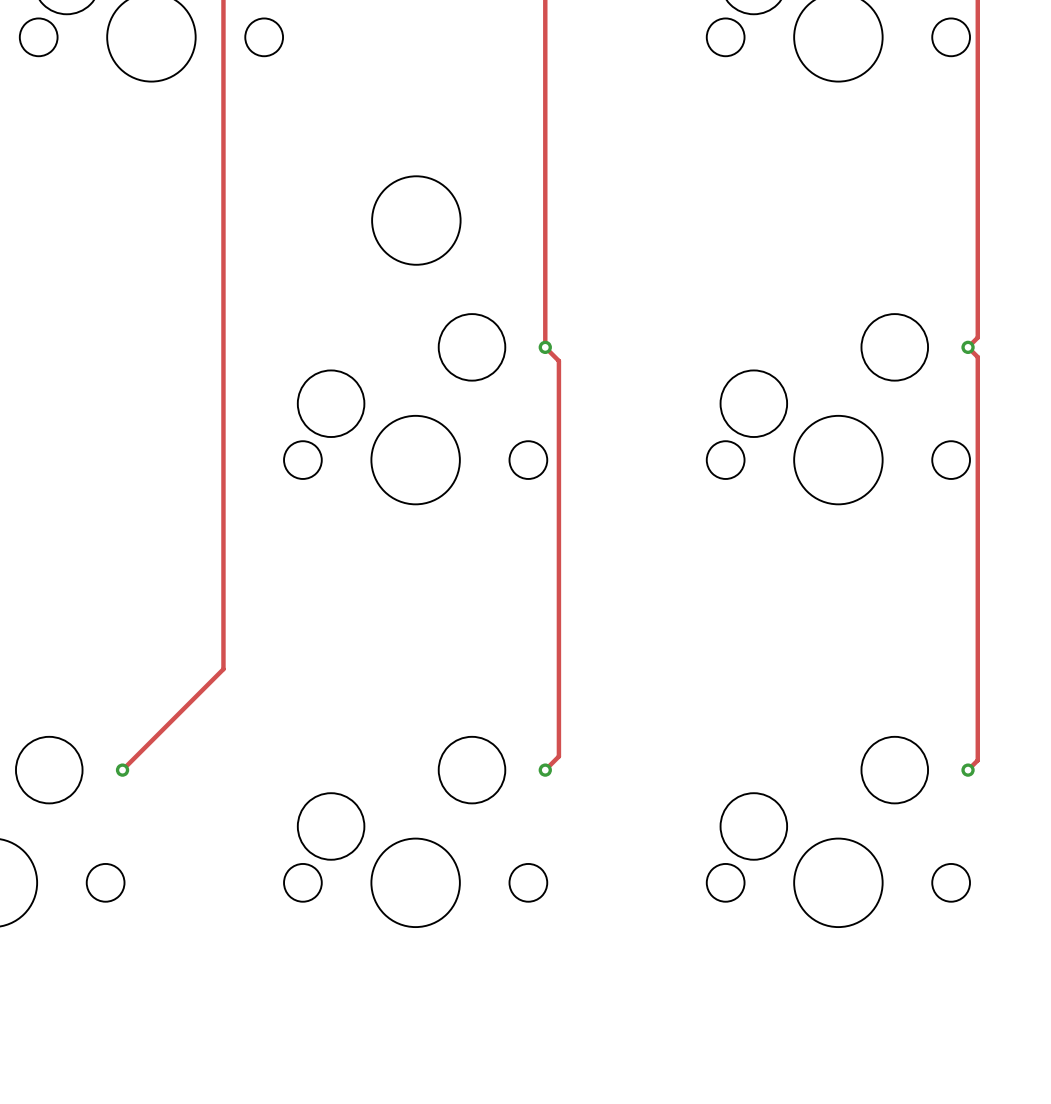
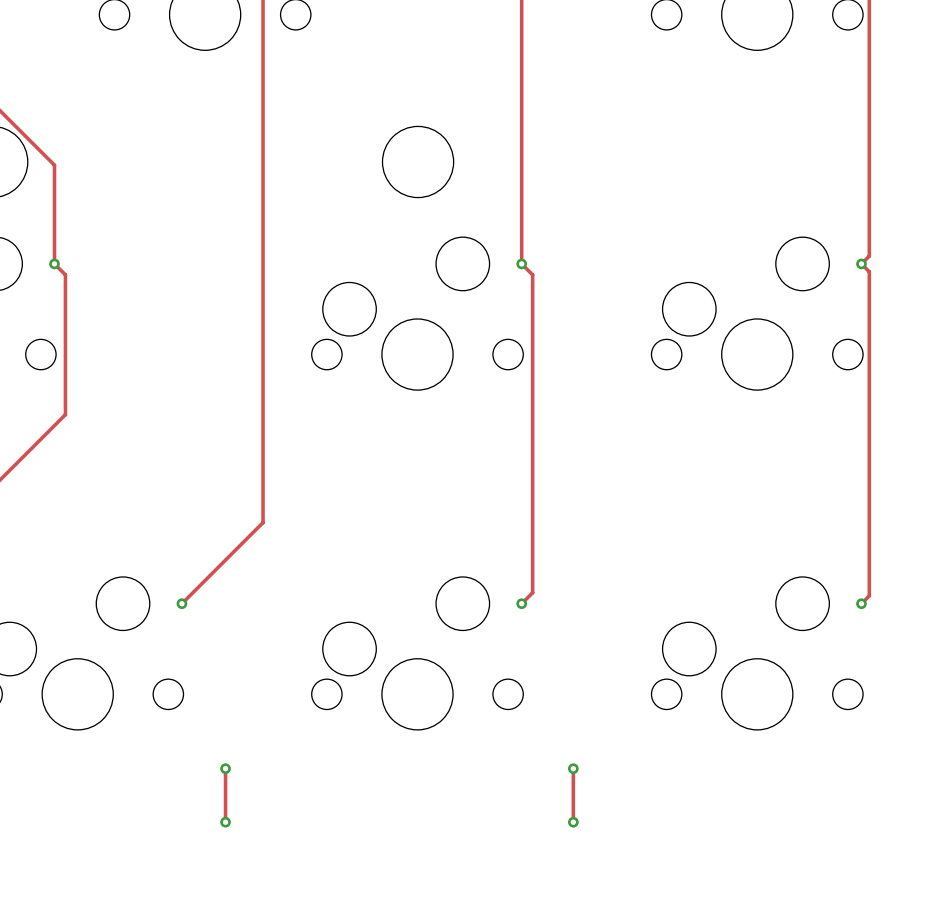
track: none -> (225, 768) (225, 822)
via: none -> (225, 768)
track: none -> (573, 768) (573, 822)
via: none -> (573, 768)
via: none -> (225, 822)
via: none -> (573, 822)

